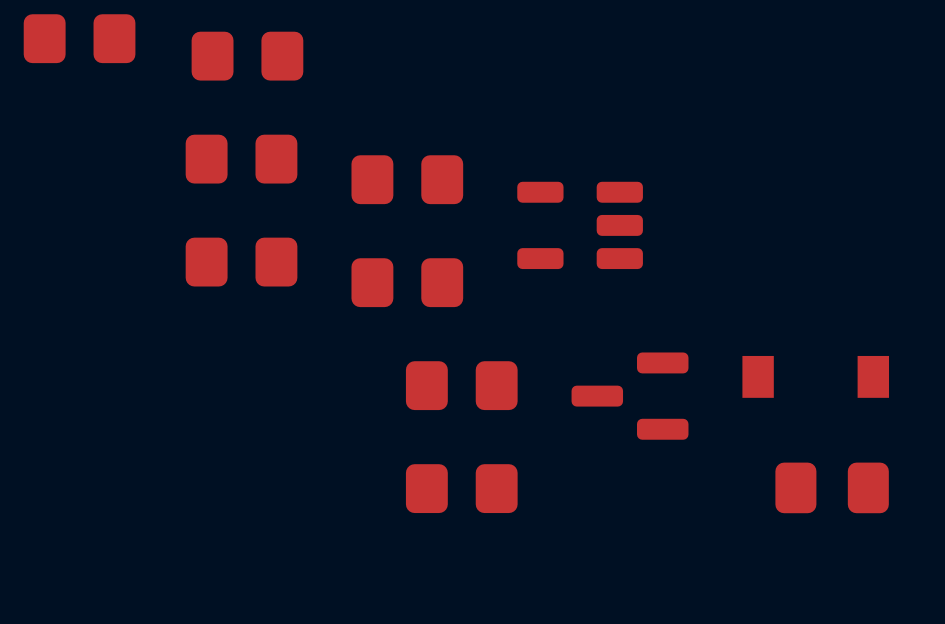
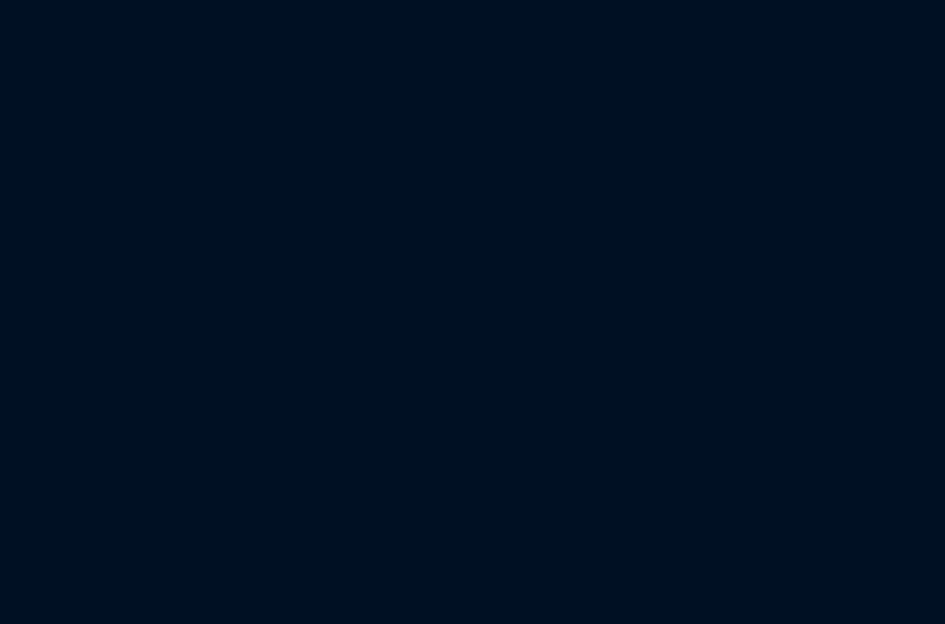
part: (79, 38) -> none
part: (247, 56) -> none
part: (241, 159) -> none
part: (407, 179) -> none
part: (580, 225) -> none
part: (241, 262) -> none
part: (407, 282) -> none
part: (815, 376) -> none
part: (461, 385) -> none
part: (630, 396) -> none
part: (832, 487) -> none
part: (461, 488) -> none

